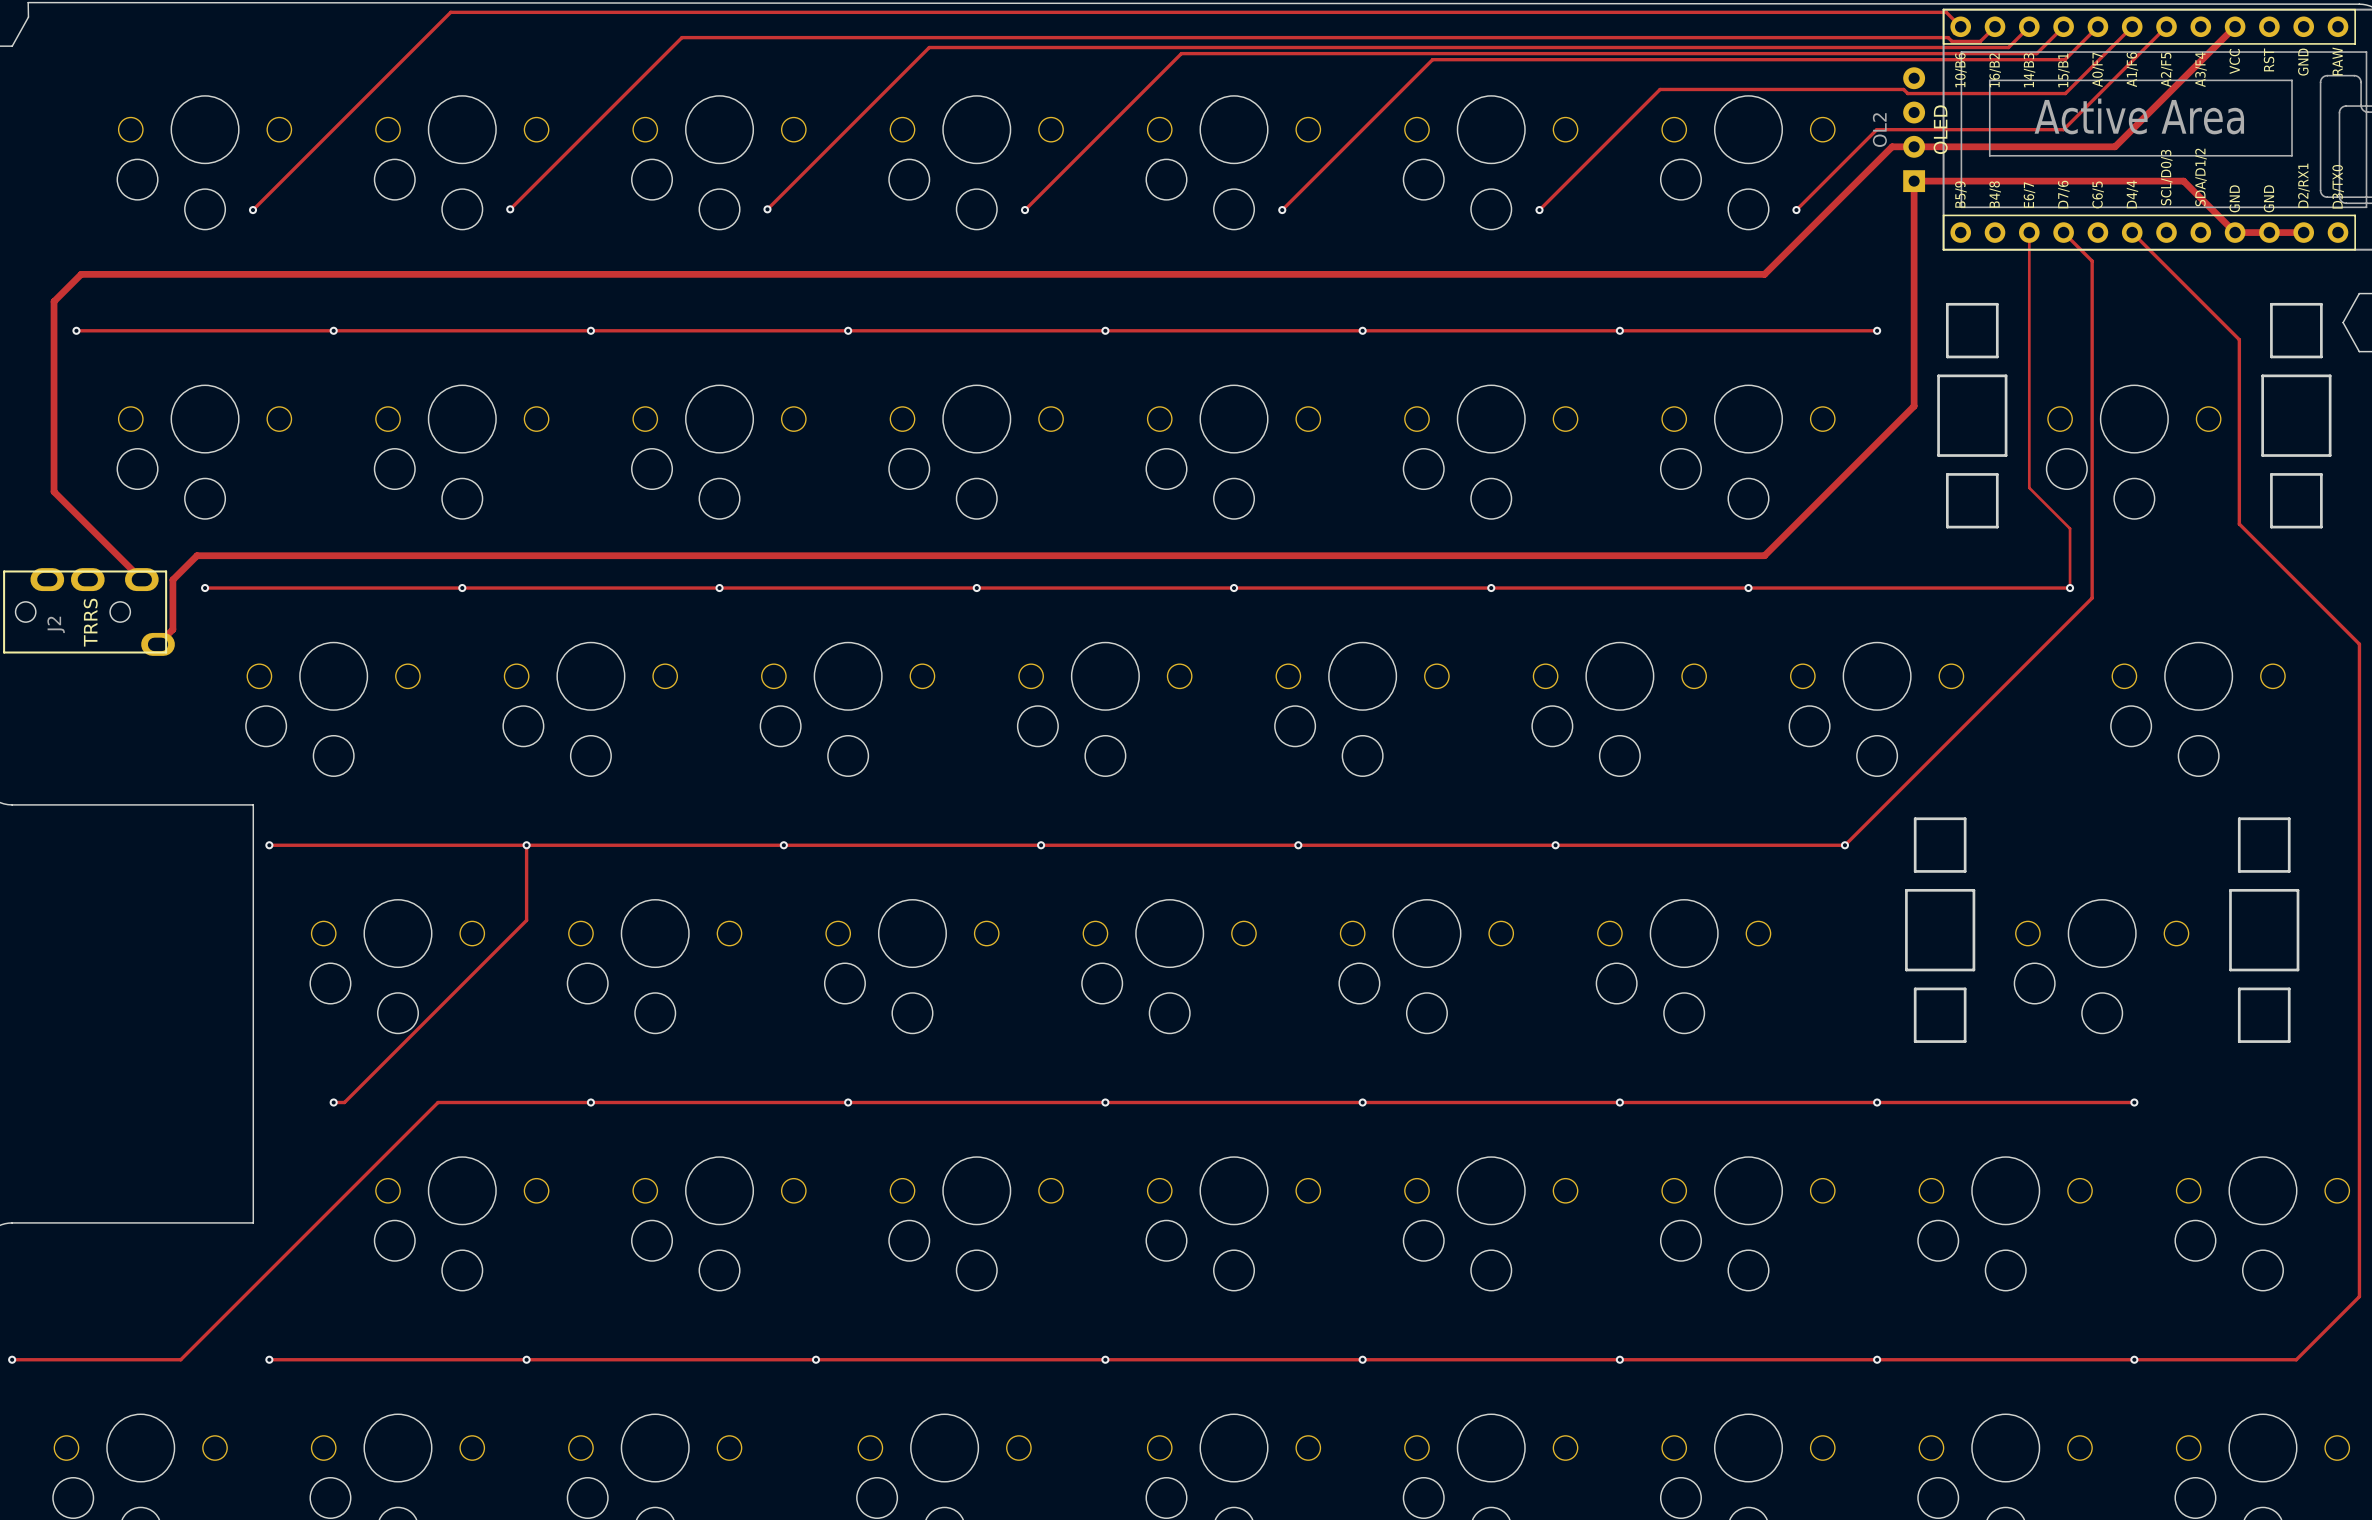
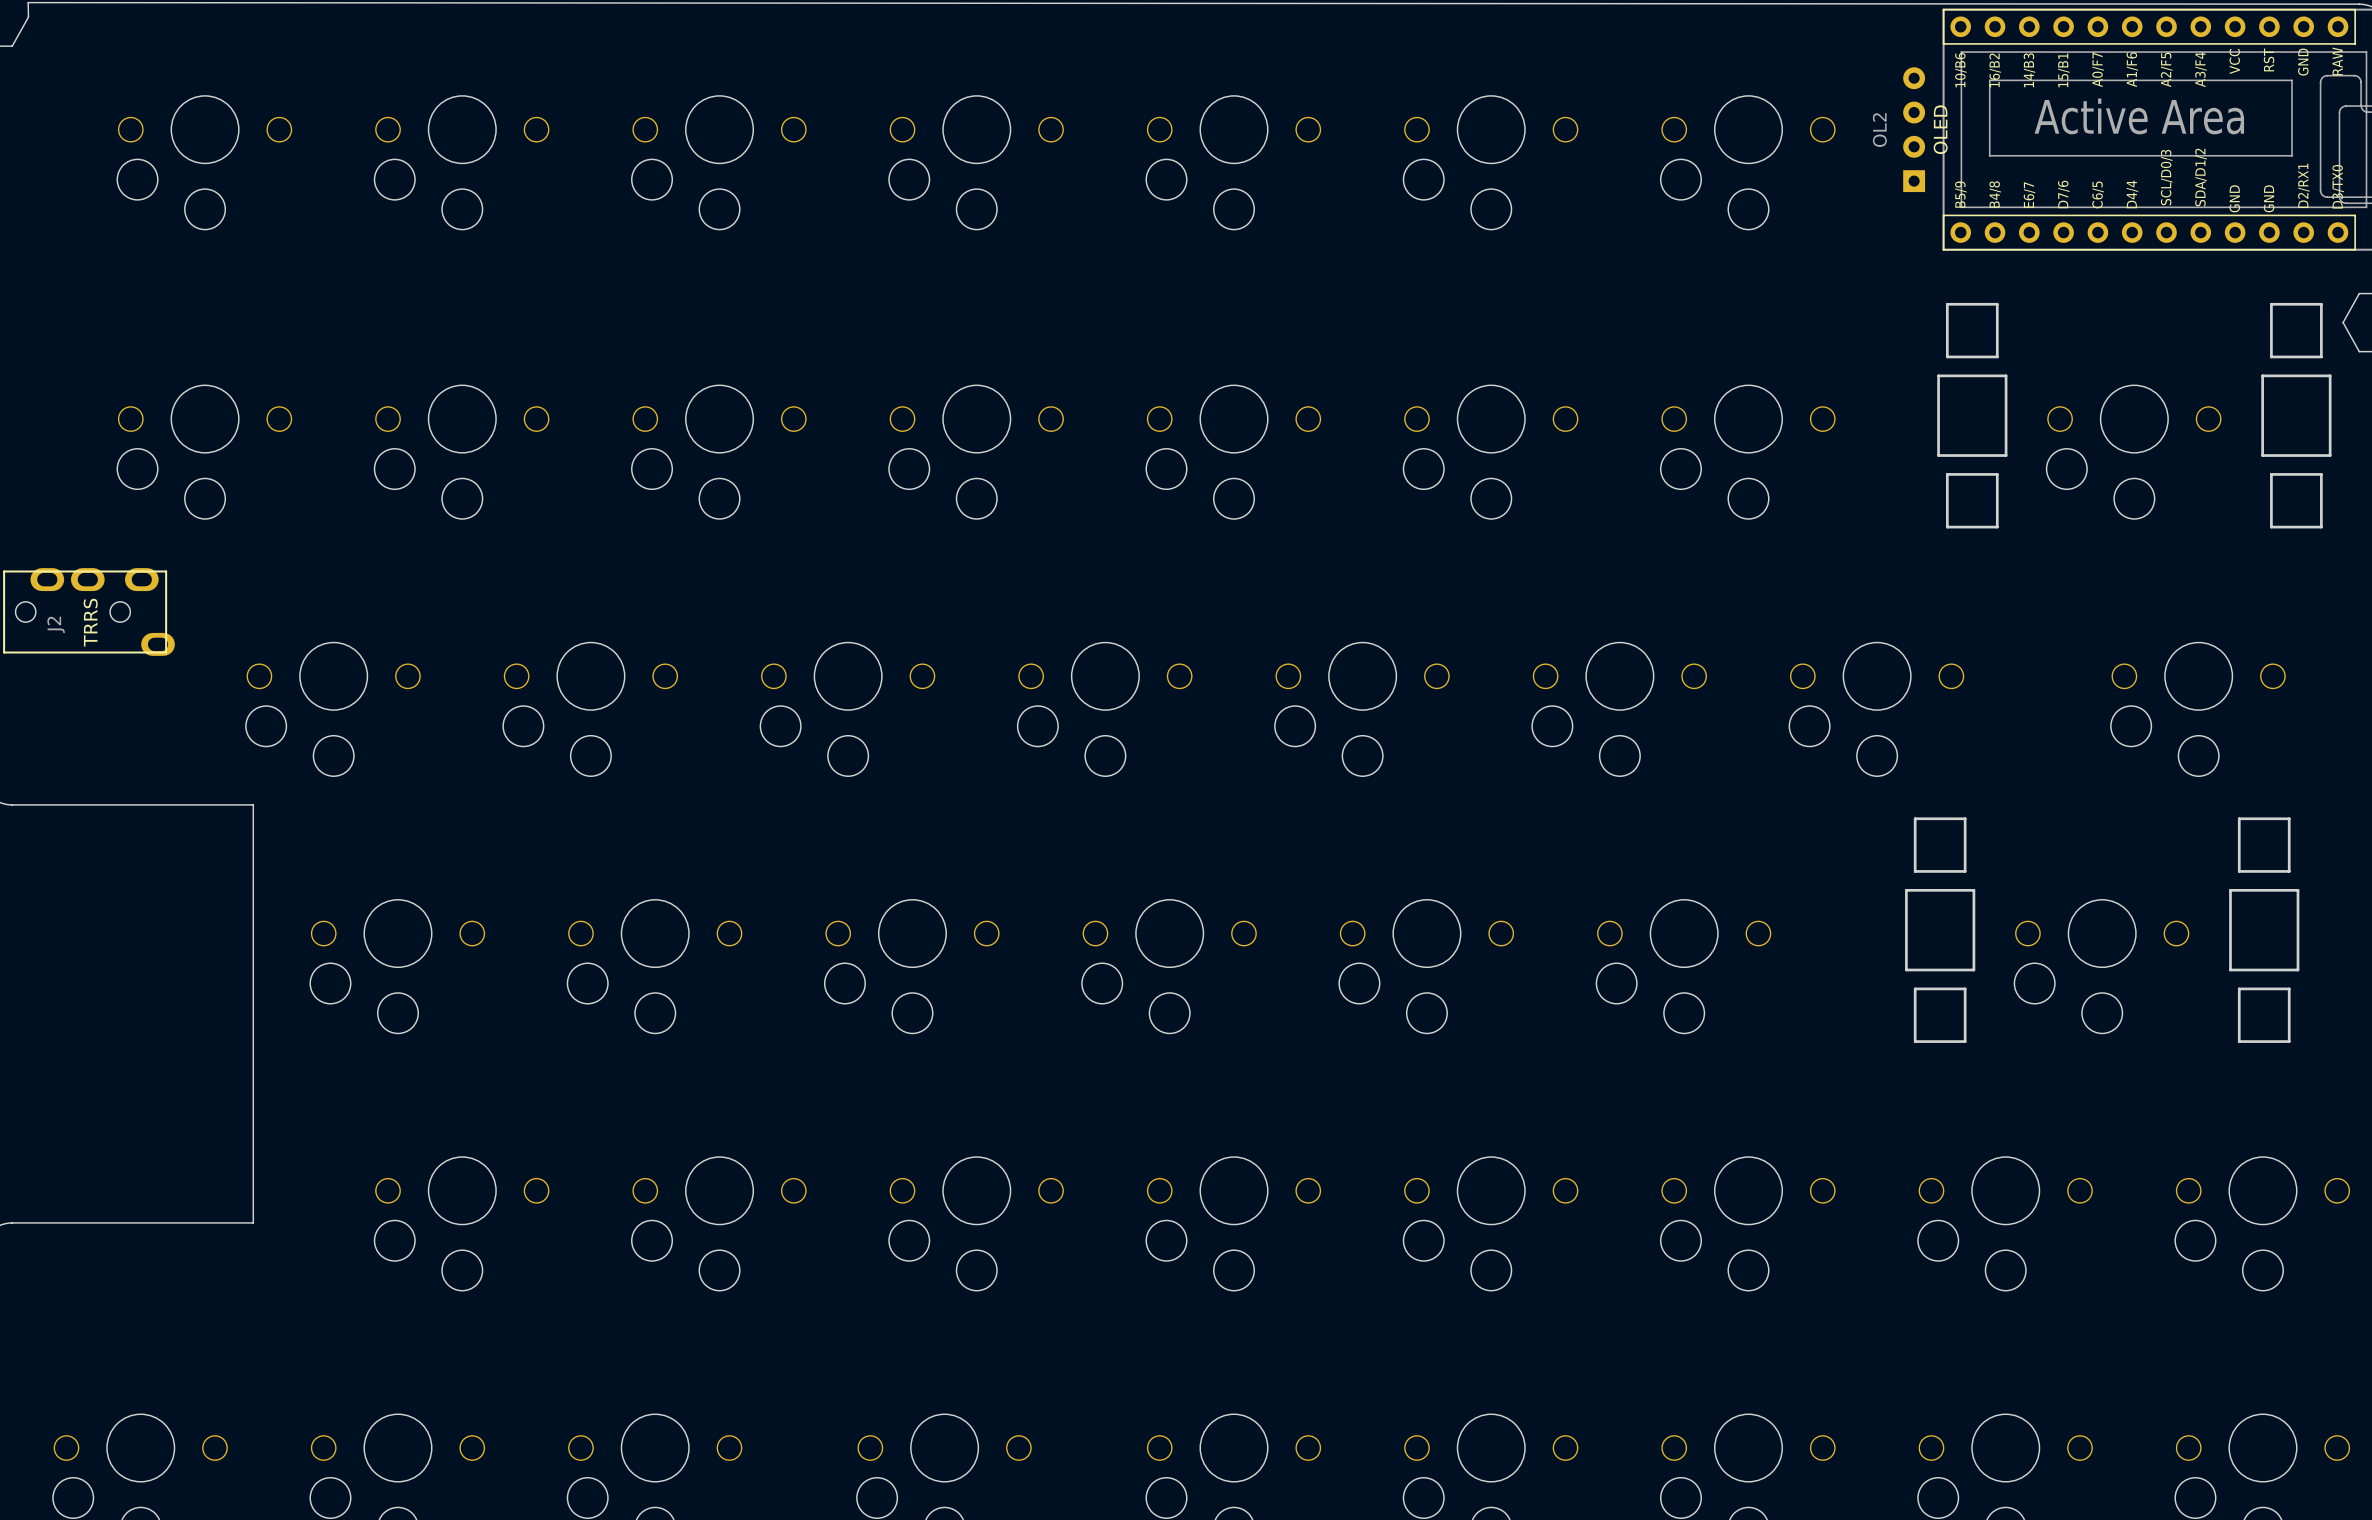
track: (1995, 26) (1980, 41) (1952, 41) (1948, 37) (681, 37) (510, 209) -> none
track: (2029, 26) (2008, 47) (929, 47) (767, 209) -> none
track: (2063, 26) (2036, 53) (1181, 53) (1025, 210) -> none
track: (2097, 26) (2065, 59) (1432, 59) (1282, 210) -> none
track: (2132, 26) (2065, 93) (1907, 93) (1903, 89) (1660, 89) (1539, 210) -> none
track: (2166, 26) (2063, 129) (1876, 129) (1796, 210) -> none
track: (2235, 26) (2115, 146) (1892, 146) (1764, 274) (81, 274) (54, 301) (54, 491) (141, 579) -> none
track: (1954, 33) (1960, 26) (1946, 12) (450, 12) (252, 210) -> none
via: (510, 209) -> none
via: (767, 209) -> none
via: (252, 210) -> none
via: (1025, 210) -> none
via: (1282, 210) -> none
via: (1539, 210) -> none
via: (1796, 210) -> none
track: (2029, 232) (2029, 487) (2070, 528) (2070, 588) (205, 588) -> none
track: (2063, 232) (2092, 261) (2092, 598) (1844, 845) (269, 845) -> none
track: (2132, 232) (2239, 339) (2239, 524) (2359, 644) (2359, 1296) (2296, 1359) (269, 1359) -> none
track: (2303, 232) (2235, 232) (2183, 181) (1914, 181) (1914, 406) (1764, 555) (197, 555) (172, 579) (172, 629) (158, 644) -> none
track: (76, 330) (1877, 330) -> none
via: (76, 330) -> none
via: (333, 330) -> none
via: (590, 330) -> none
via: (848, 330) -> none
via: (1105, 330) -> none
via: (1362, 330) -> none
via: (1619, 330) -> none
via: (1877, 330) -> none
via: (205, 588) -> none
via: (462, 588) -> none
via: (719, 588) -> none
via: (976, 588) -> none
via: (1234, 588) -> none
via: (1491, 588) -> none
via: (1748, 588) -> none
via: (2070, 588) -> none
via: (269, 845) -> none
track: (526, 845) (526, 920) (344, 1102) (333, 1102) -> none
via: (526, 845) -> none
via: (783, 845) -> none
via: (1041, 845) -> none
via: (1298, 845) -> none
via: (1555, 845) -> none
via: (1844, 845) -> none
via: (333, 1102) -> none
via: (590, 1102) -> none
via: (848, 1102) -> none
via: (1105, 1102) -> none
via: (1362, 1102) -> none
via: (1619, 1102) -> none
via: (1877, 1102) -> none
track: (2134, 1102) (438, 1102) (180, 1359) (12, 1359) -> none
via: (2134, 1102) -> none
via: (12, 1359) -> none
via: (269, 1359) -> none
via: (526, 1359) -> none
via: (816, 1359) -> none
via: (1105, 1359) -> none
via: (1362, 1359) -> none
via: (1619, 1359) -> none
via: (1877, 1359) -> none
via: (2134, 1359) -> none

